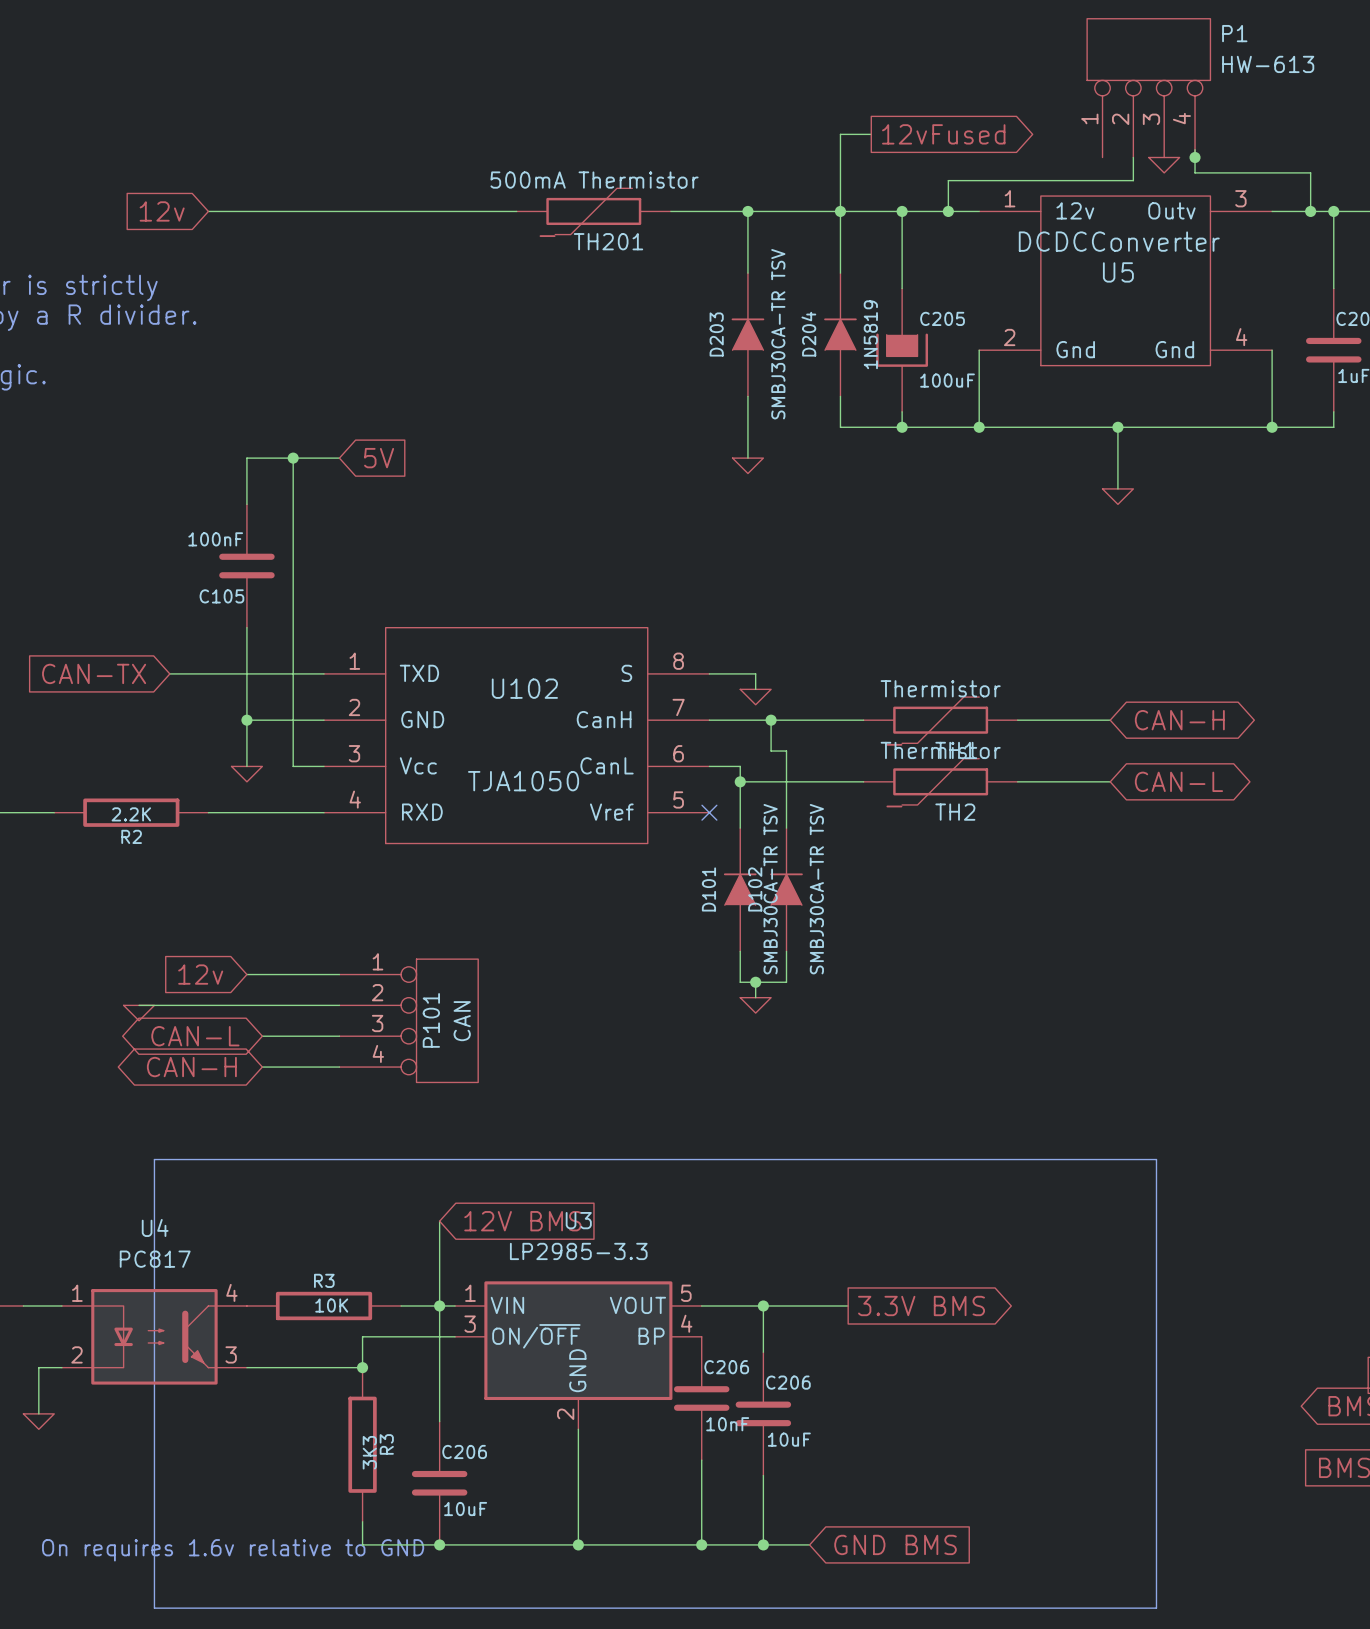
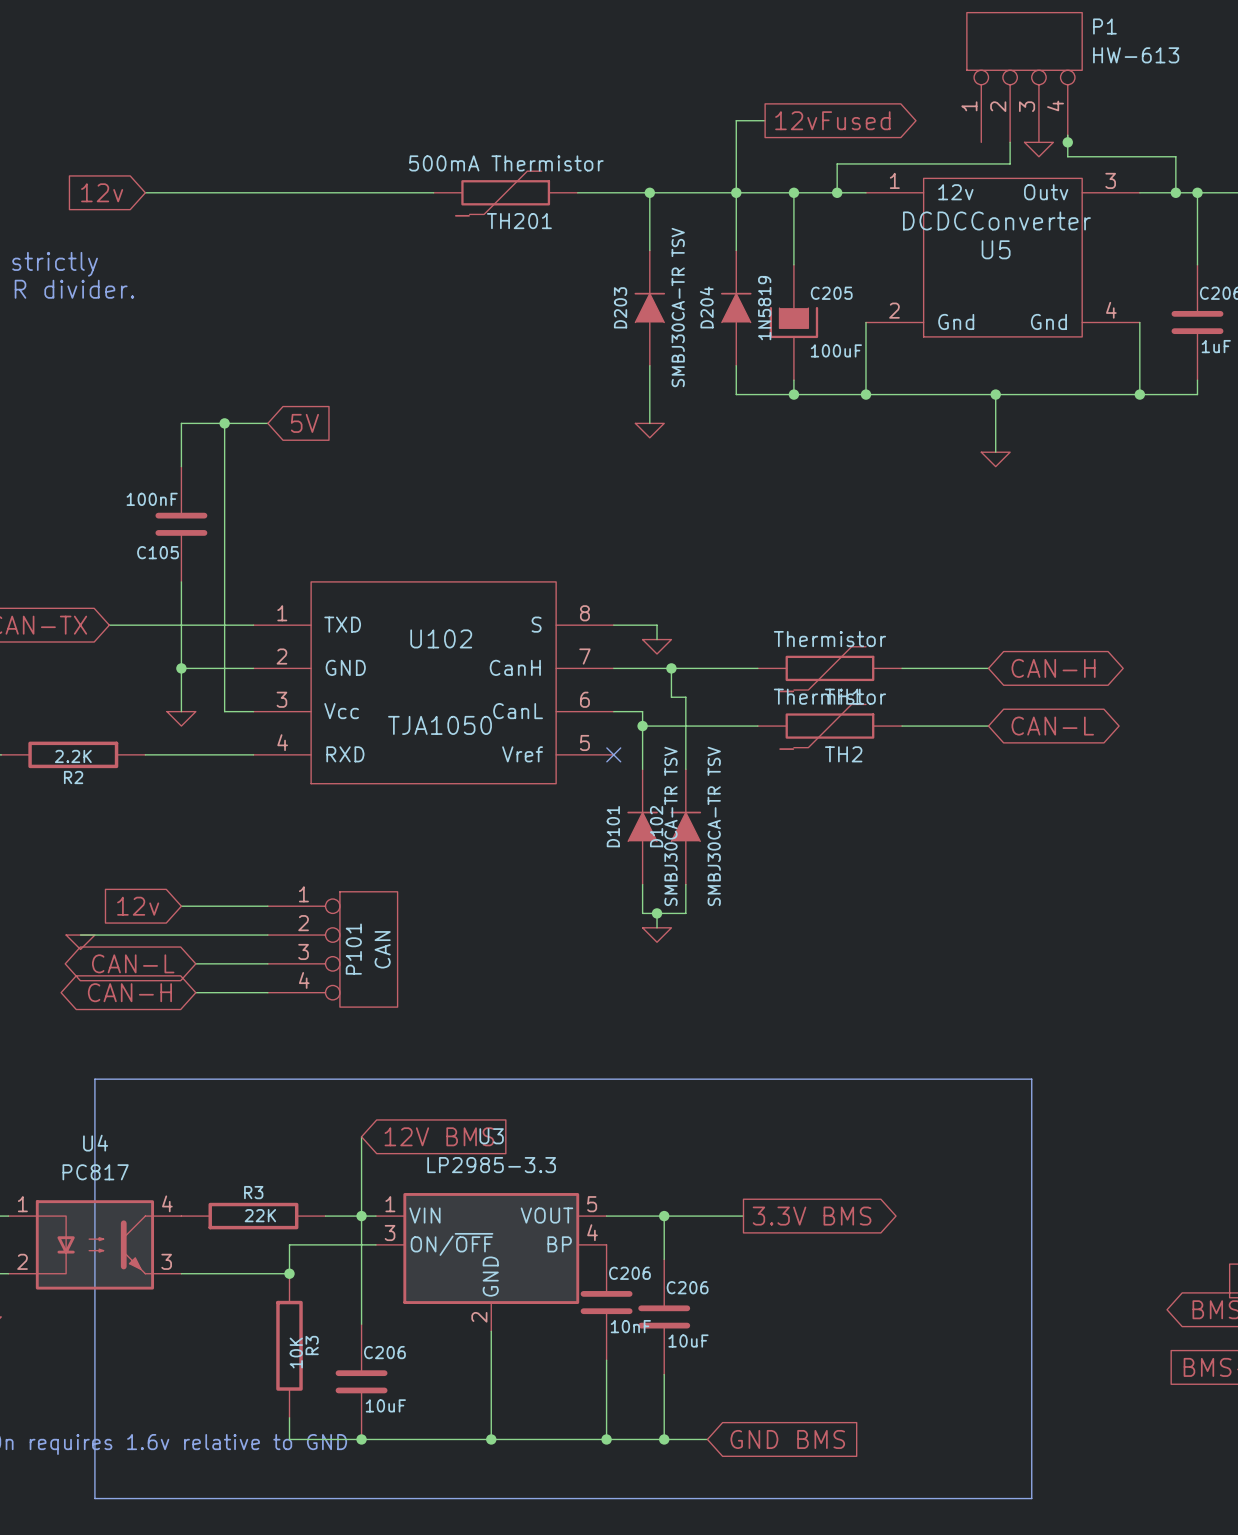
R3 value: 10K (331, 1305) -> 22K (260, 1215)
R3 value: 3K3 (369, 1452) -> 10K (296, 1352)

